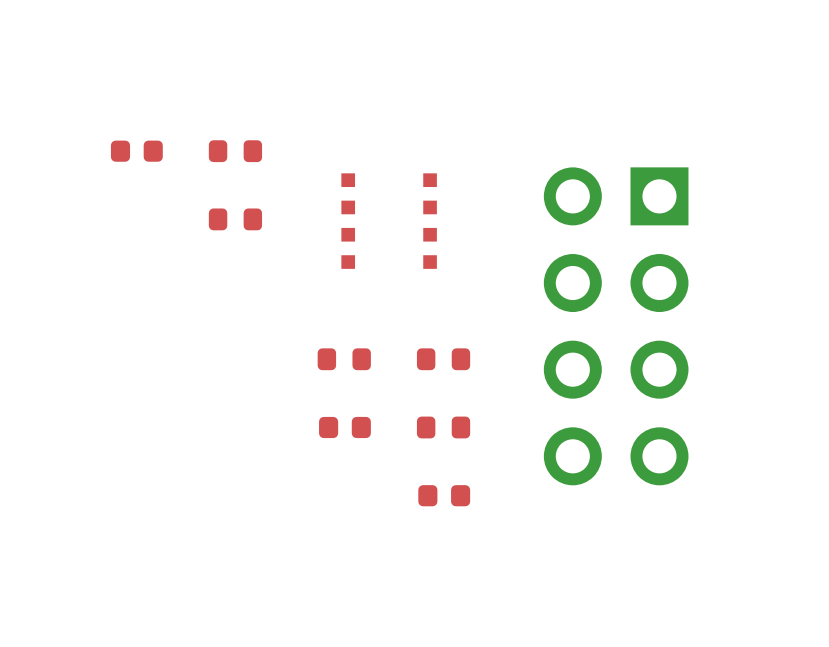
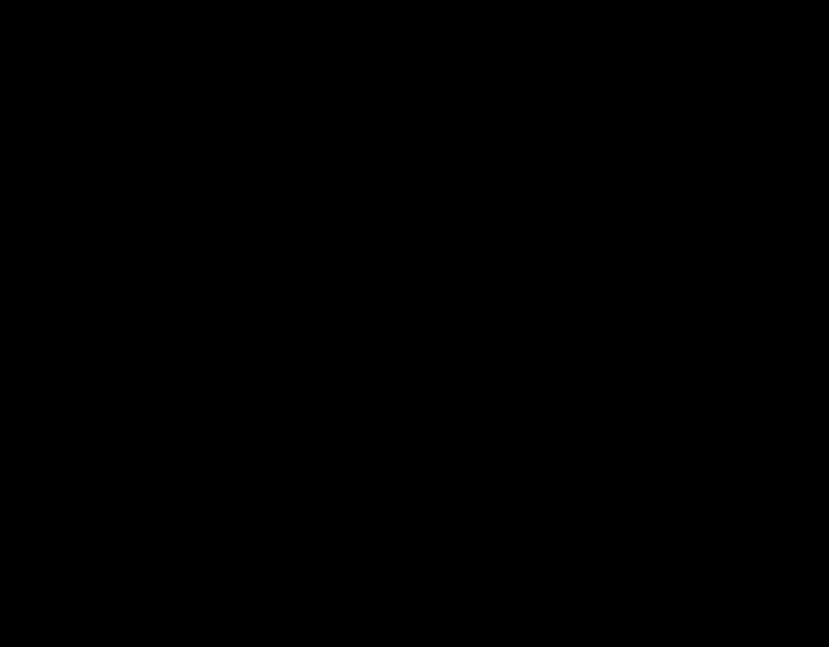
part: (136, 151) -> none
part: (235, 151) -> none
part: (235, 219) -> none
part: (389, 221) -> none
part: (616, 326) -> none
part: (344, 359) -> none
part: (443, 359) -> none
part: (344, 427) -> none
part: (443, 427) -> none
part: (444, 495) -> none

